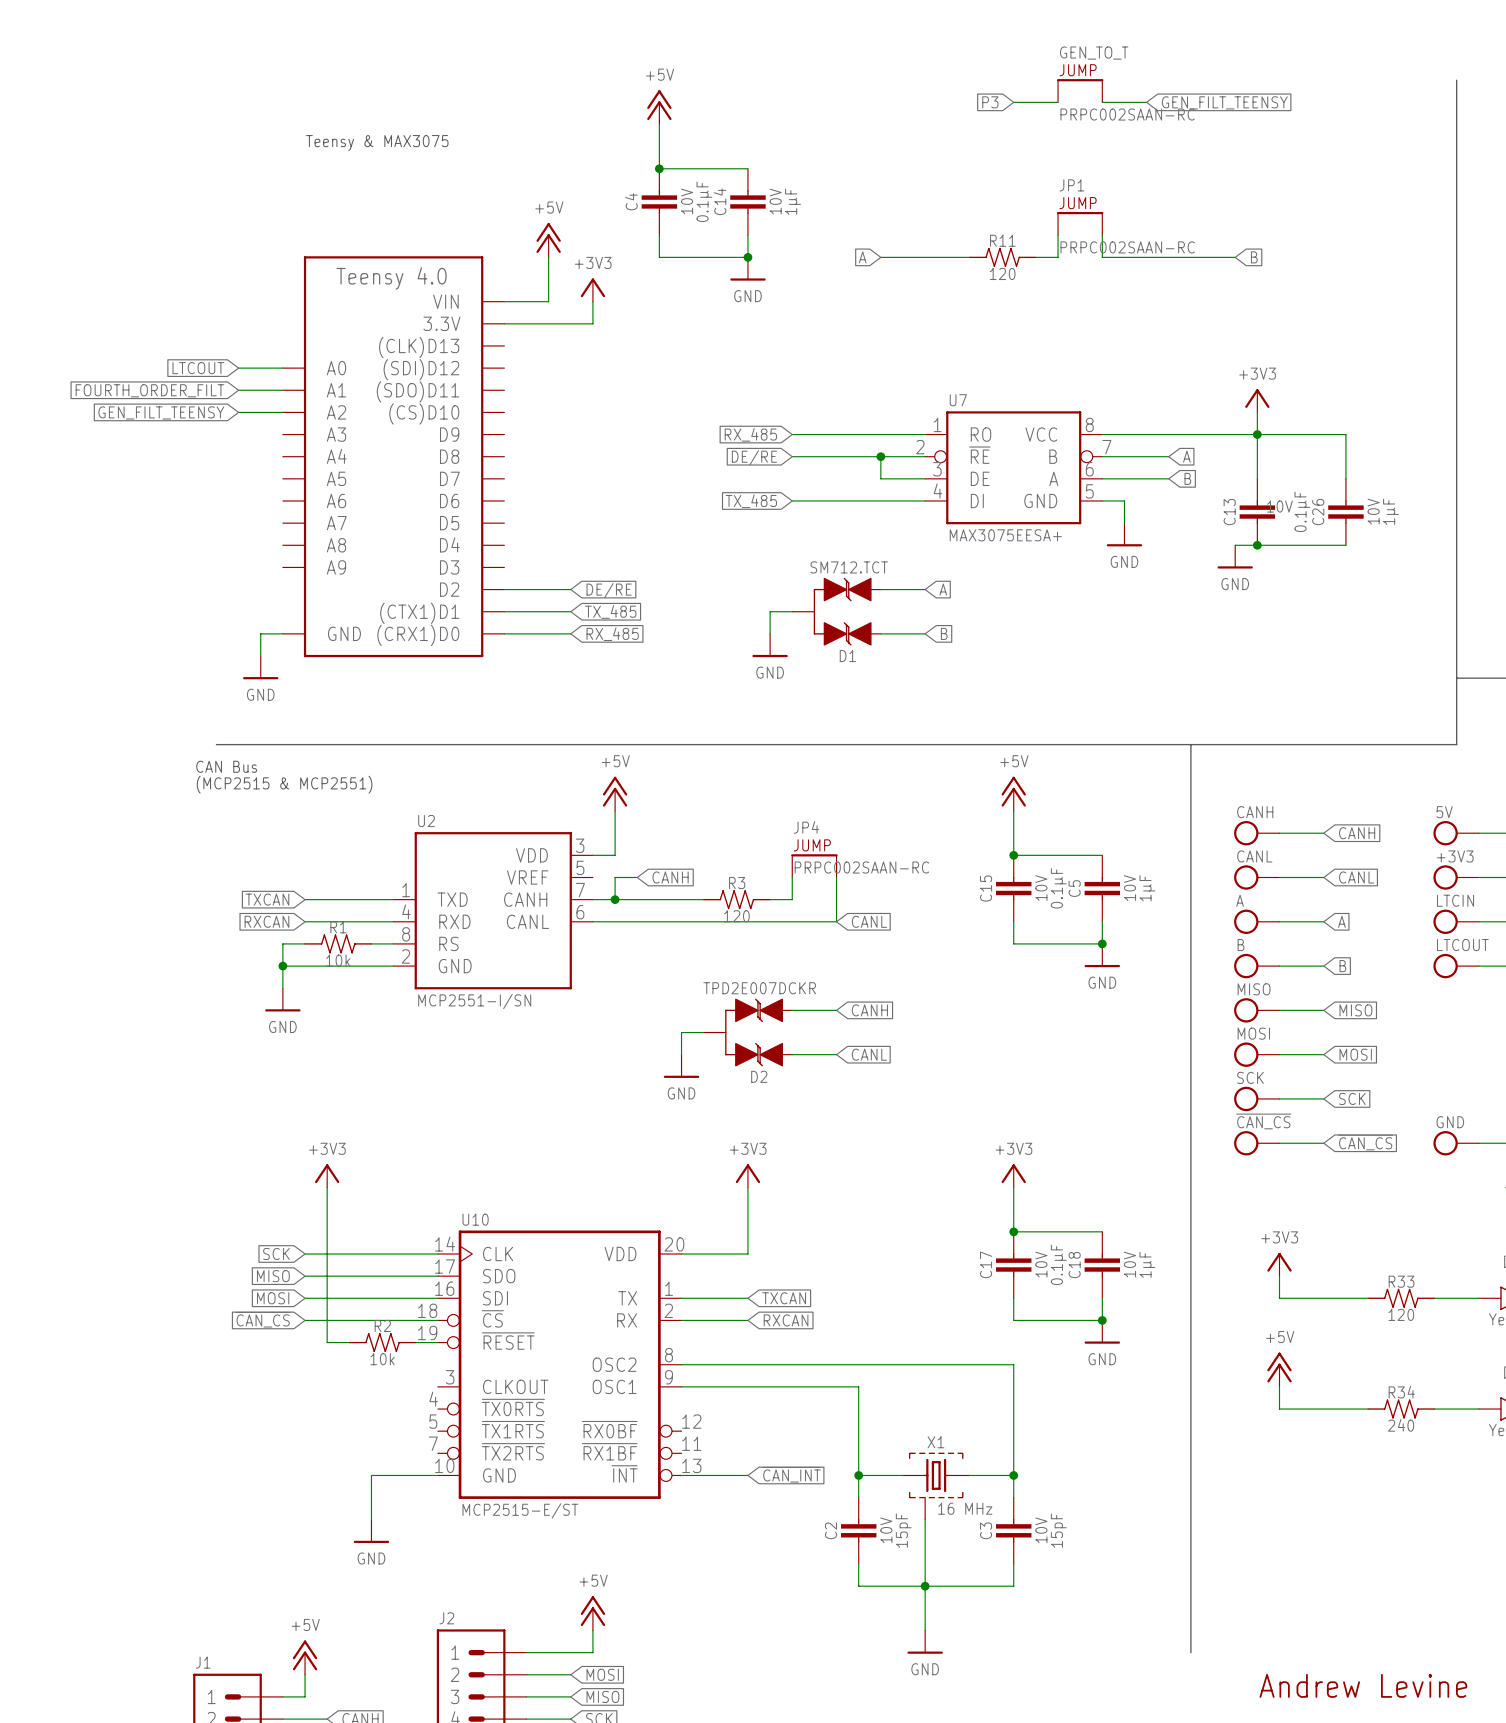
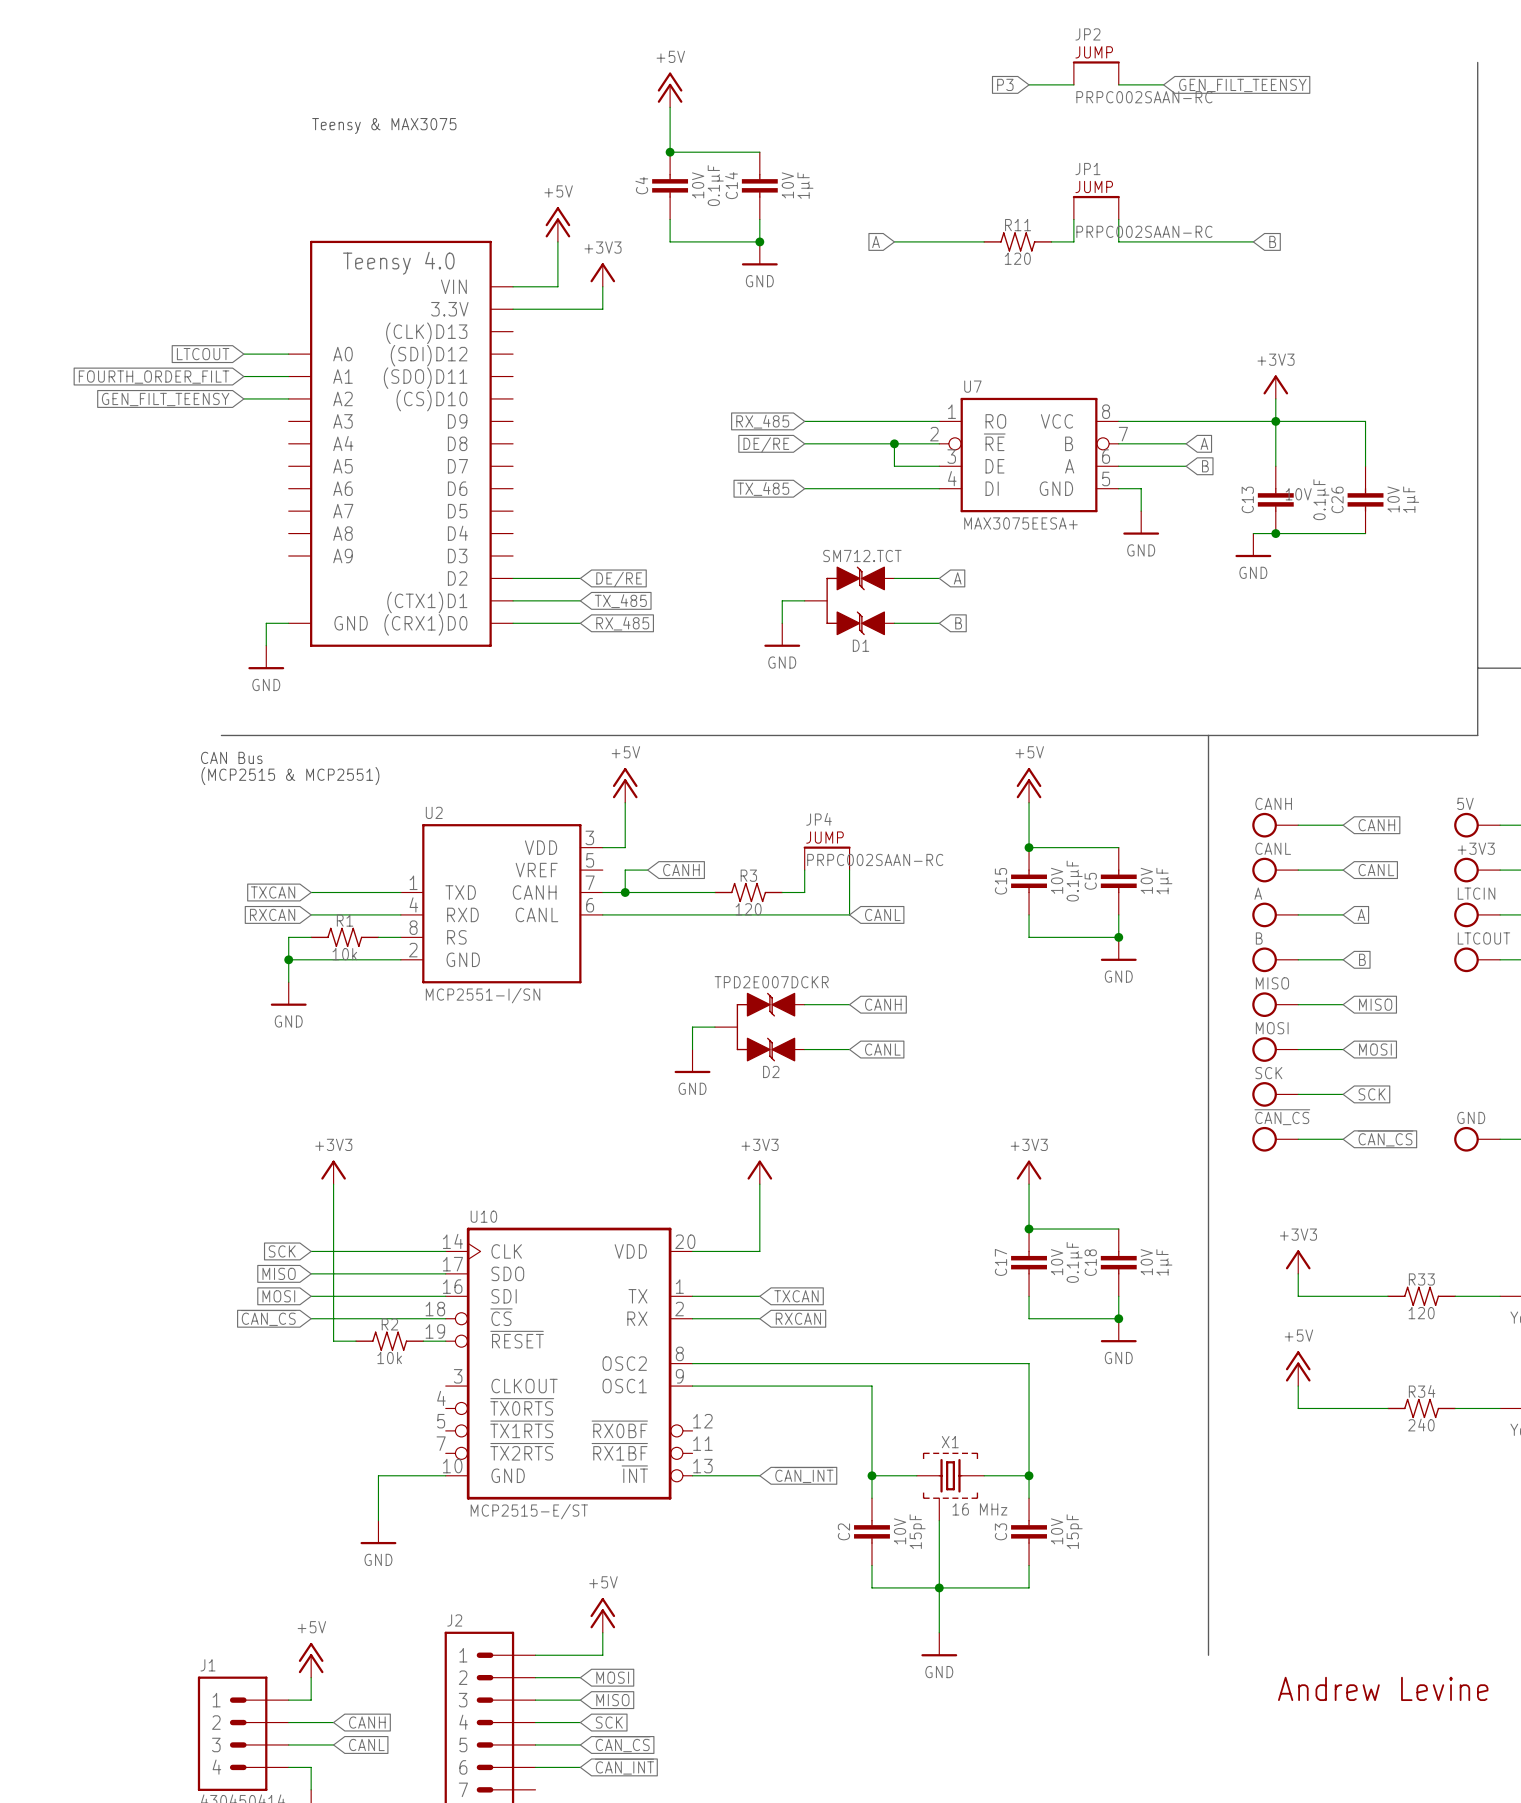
GEN_TO_T name: GEN_TO_T (1094, 53) -> JP2 (1087, 34)

